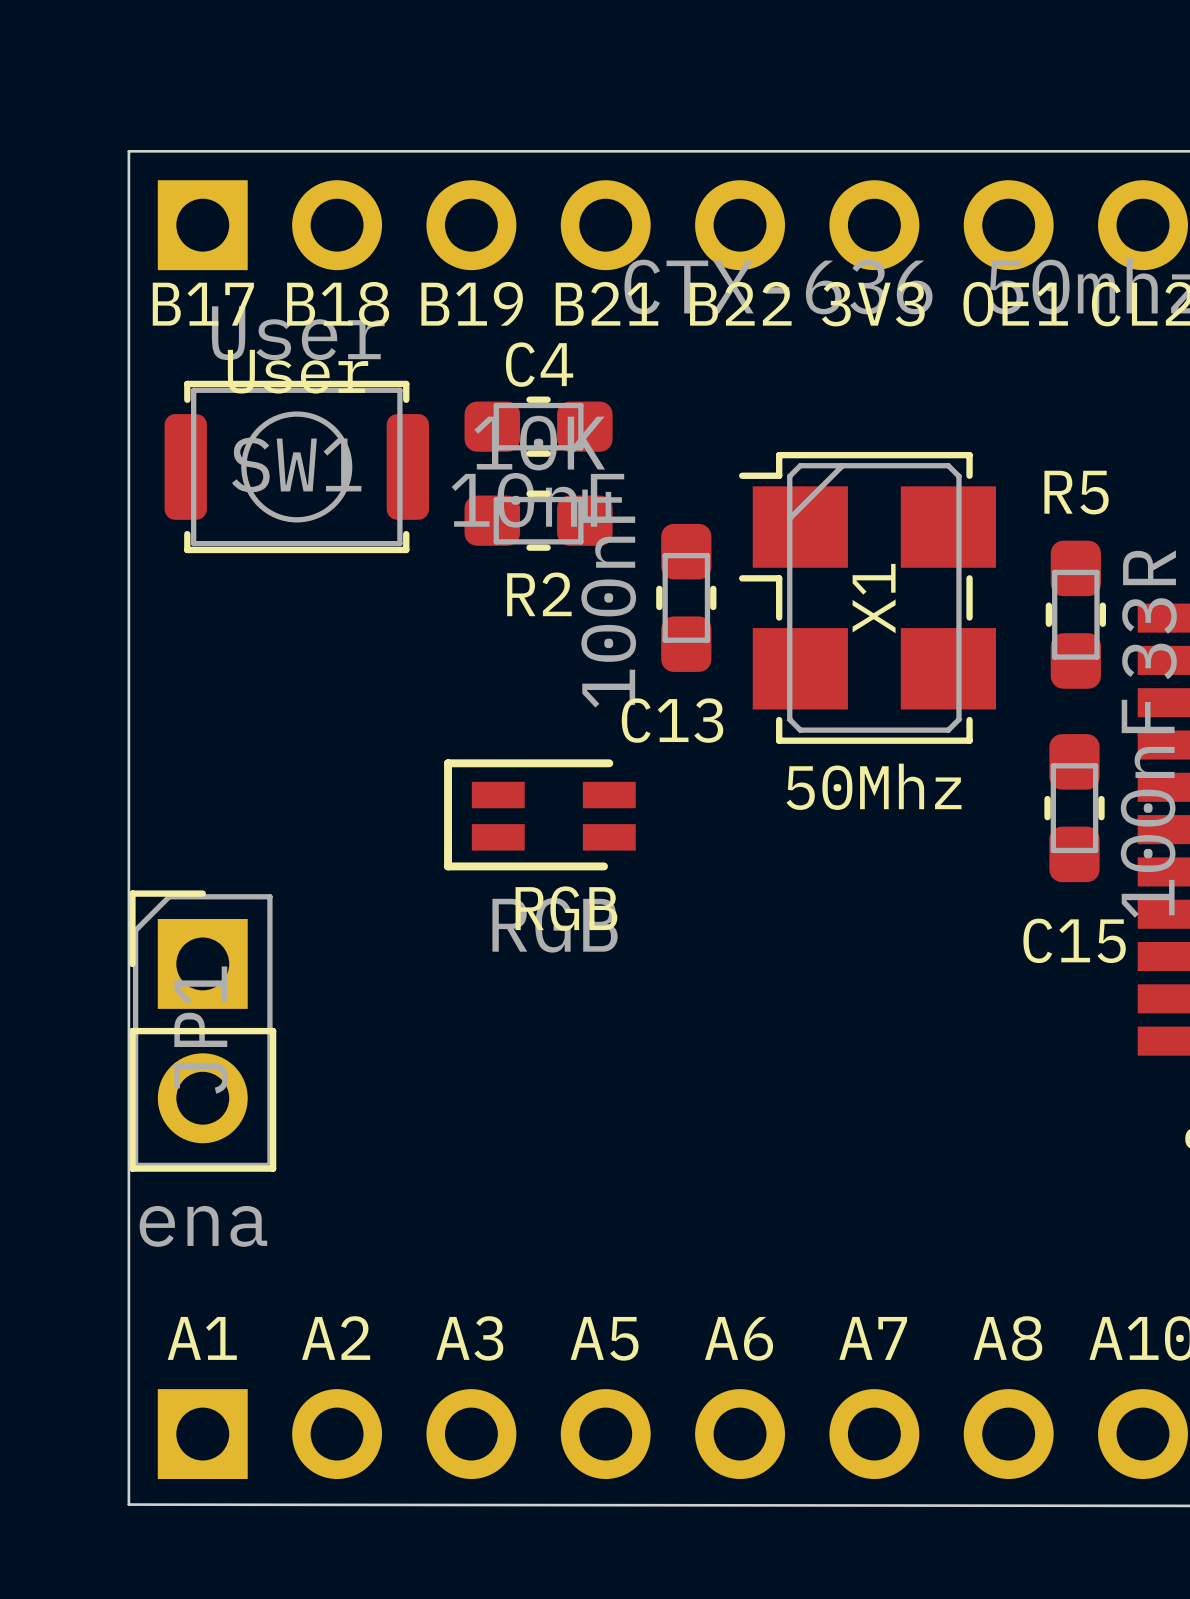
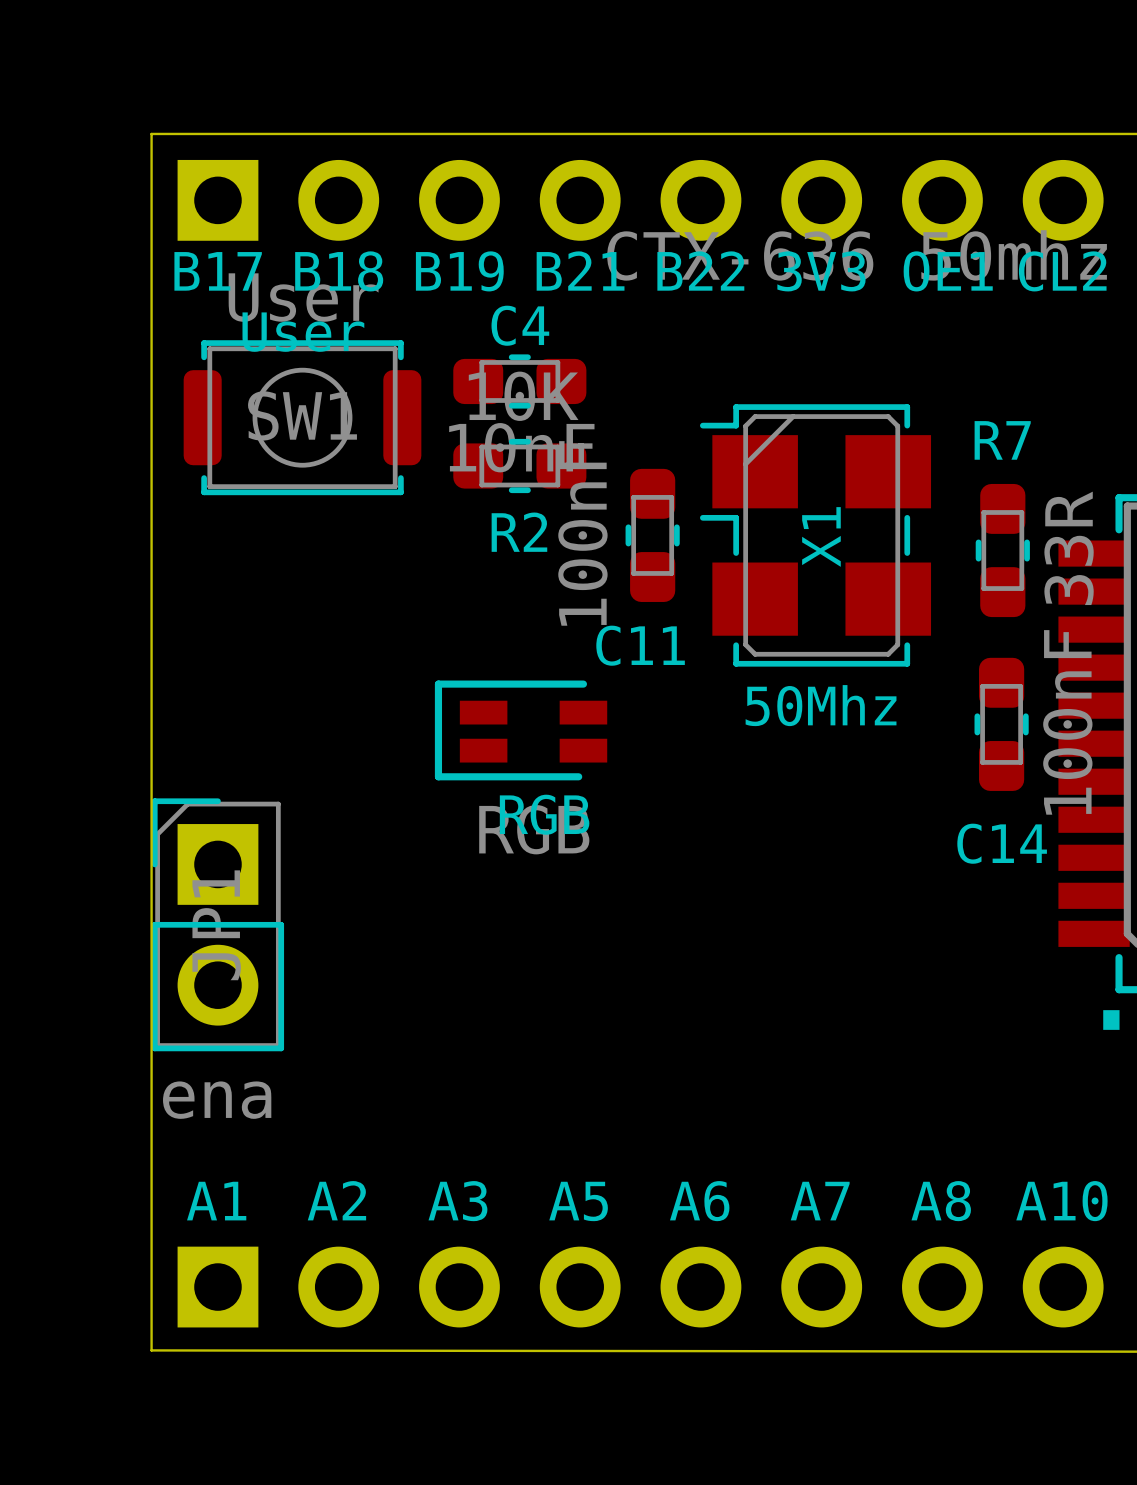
R5 name: R5 (1076, 492) -> R7 (1002, 440)
C13 name: C13 (672, 720) -> C11 (640, 645)
C15 name: C15 (1074, 940) -> C14 (1002, 843)

